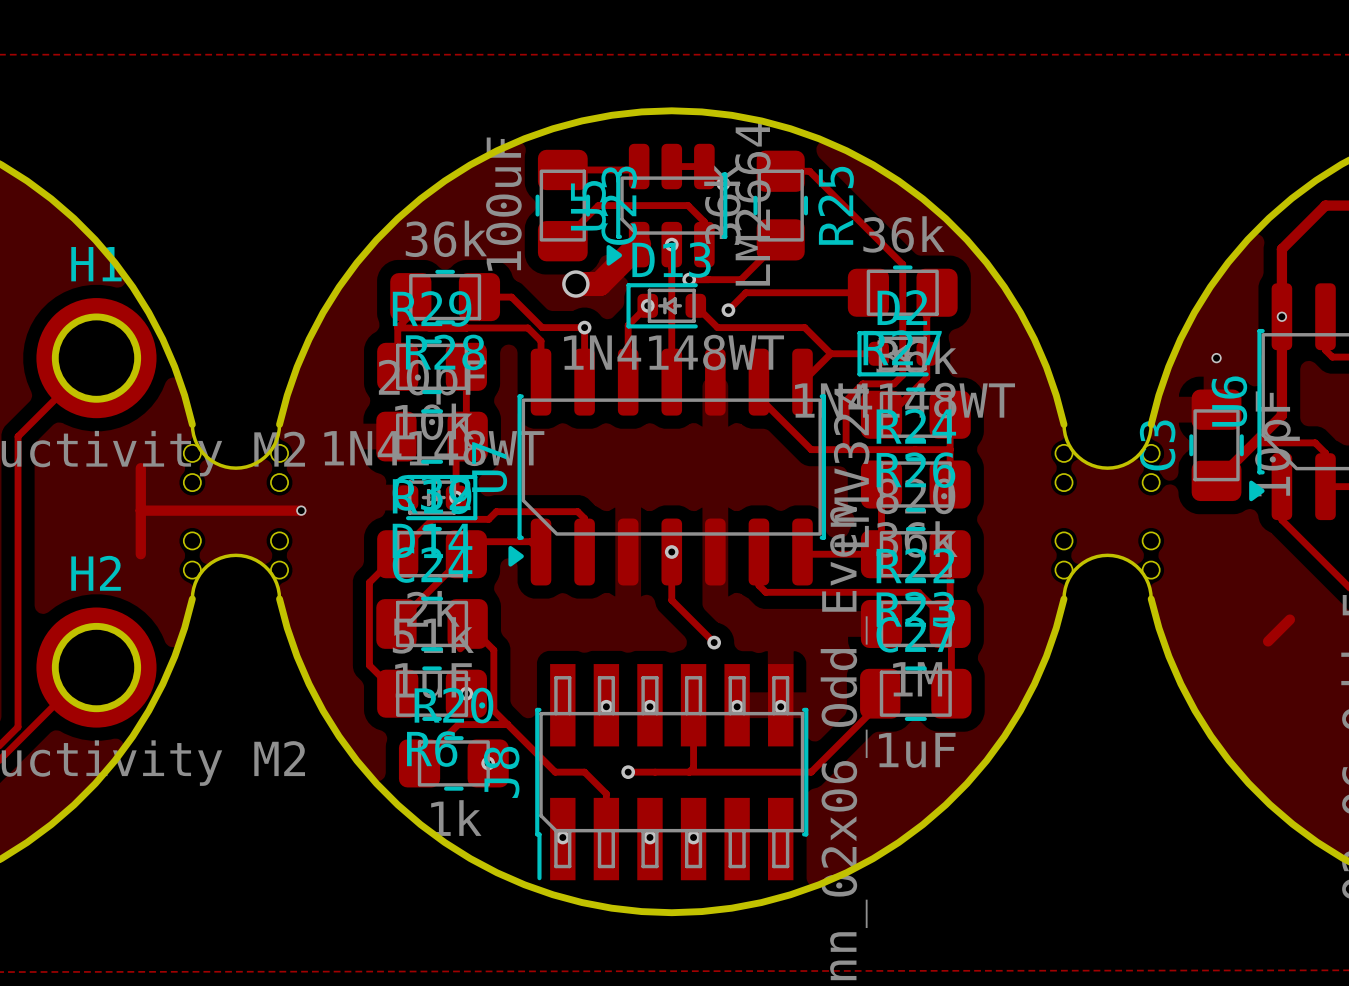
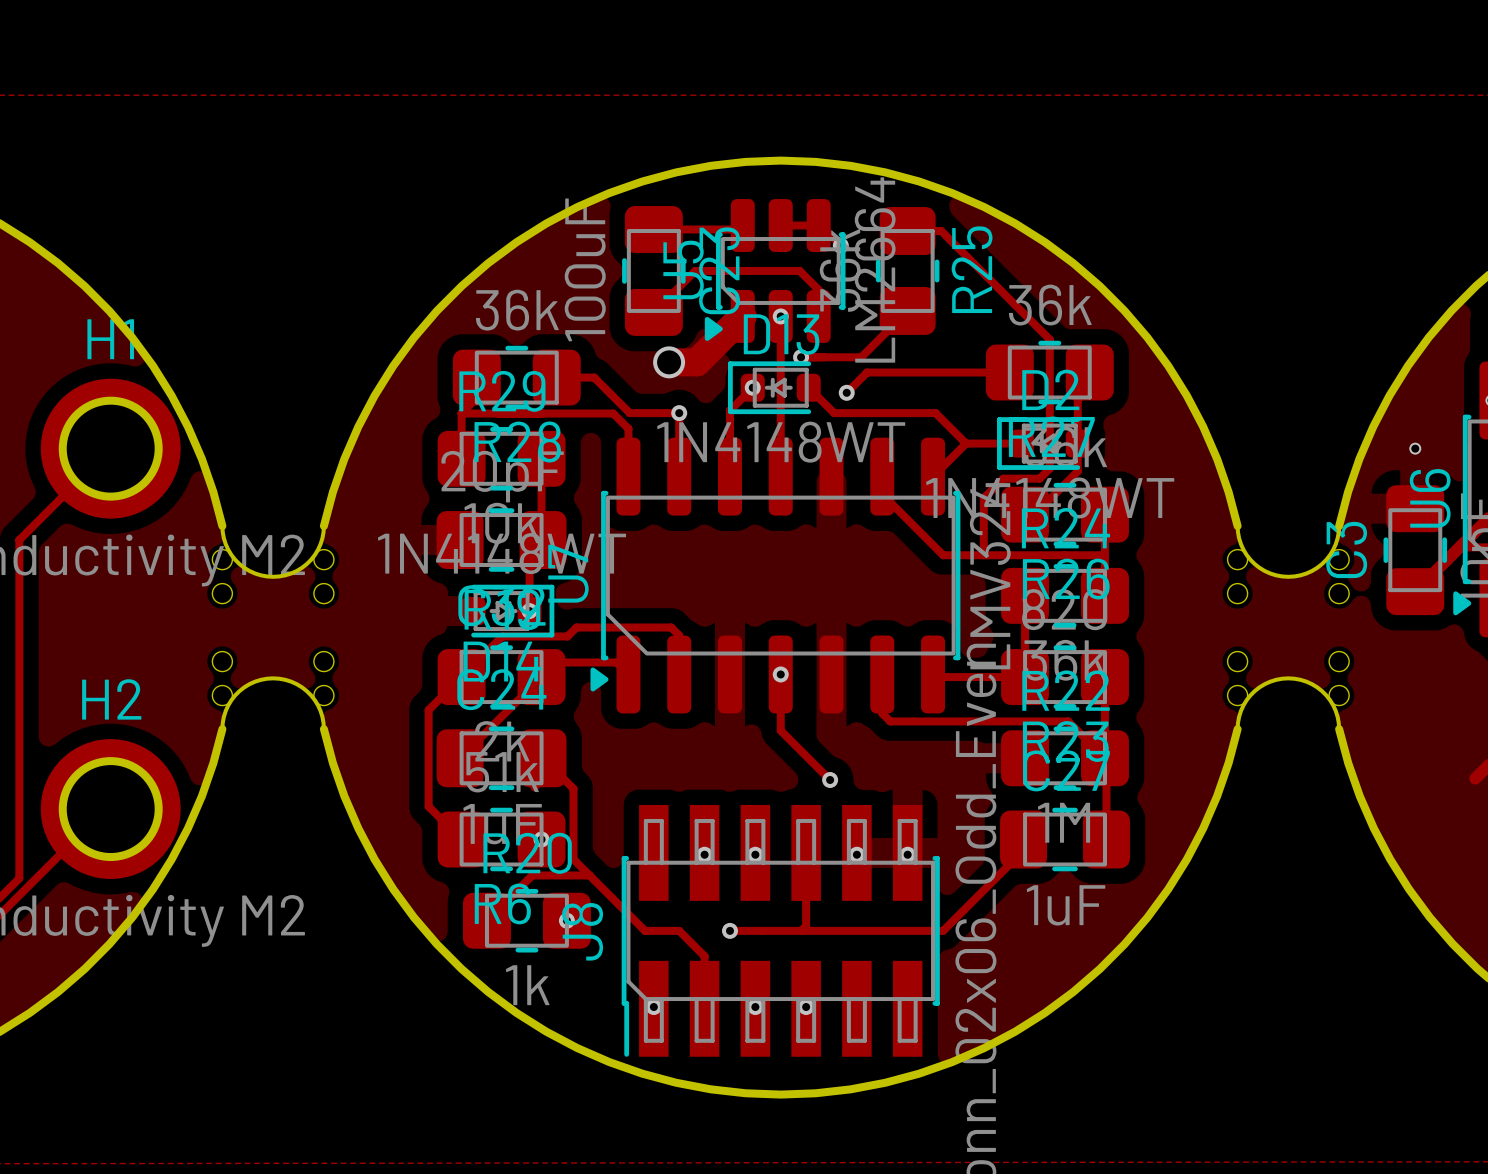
track: (140, 468) (140, 554) -> none
track: (140, 510) (301, 510) -> none
via: (301, 510) -> none

